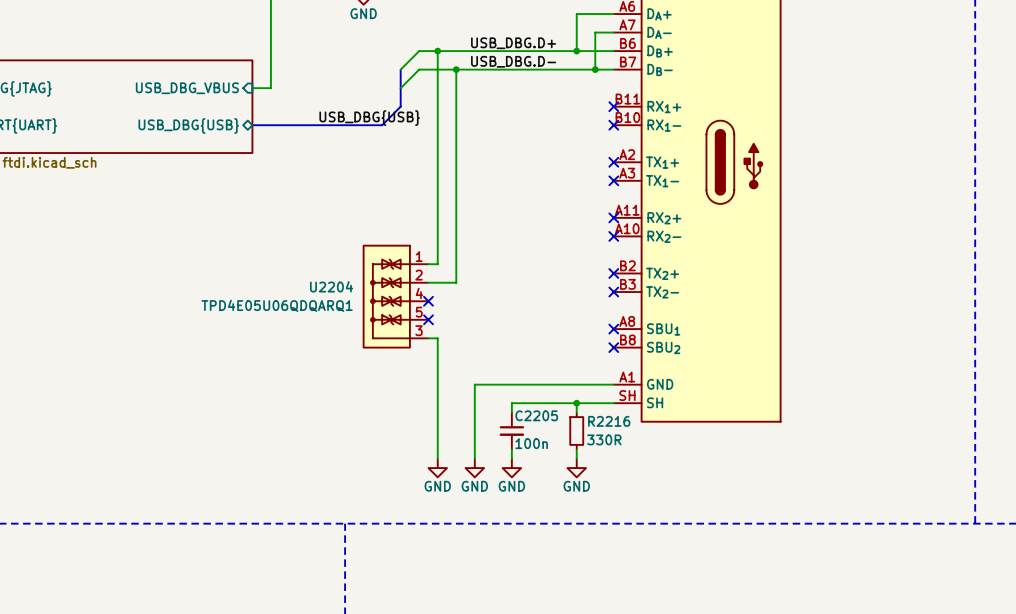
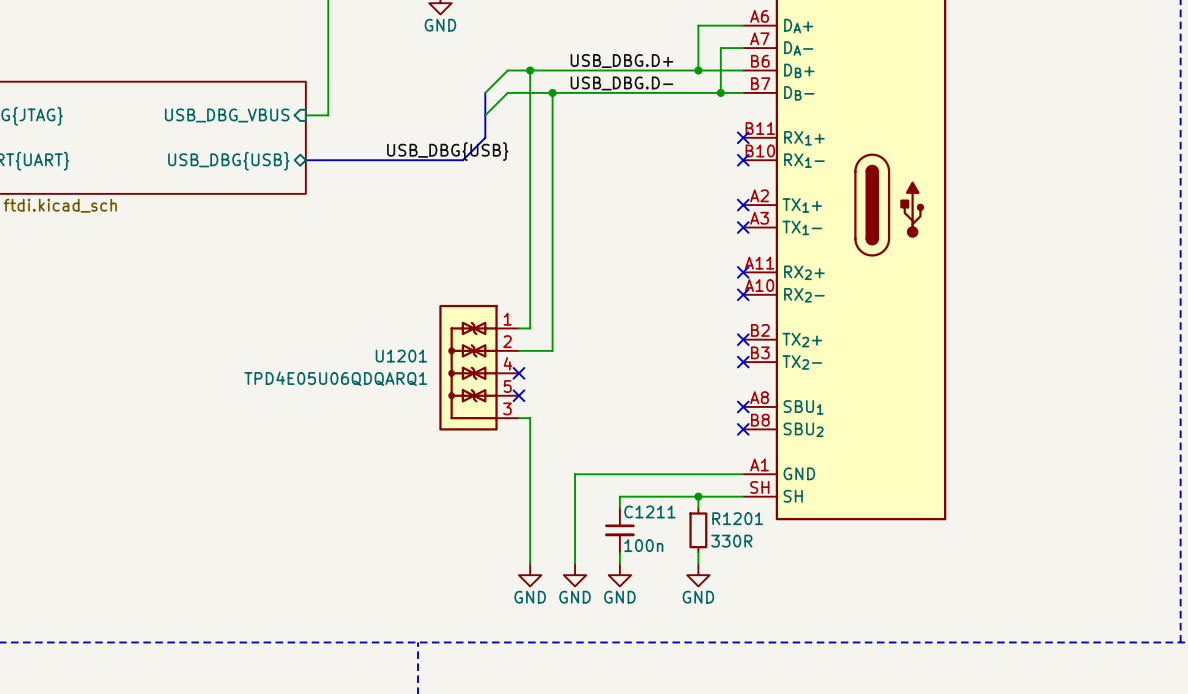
U2204 name: U2204 (331, 286) -> U1201 (401, 356)
C2205 name: C2205 (536, 415) -> C1211 (649, 511)
R2216 name: R2216 (609, 421) -> R1201 (737, 518)

